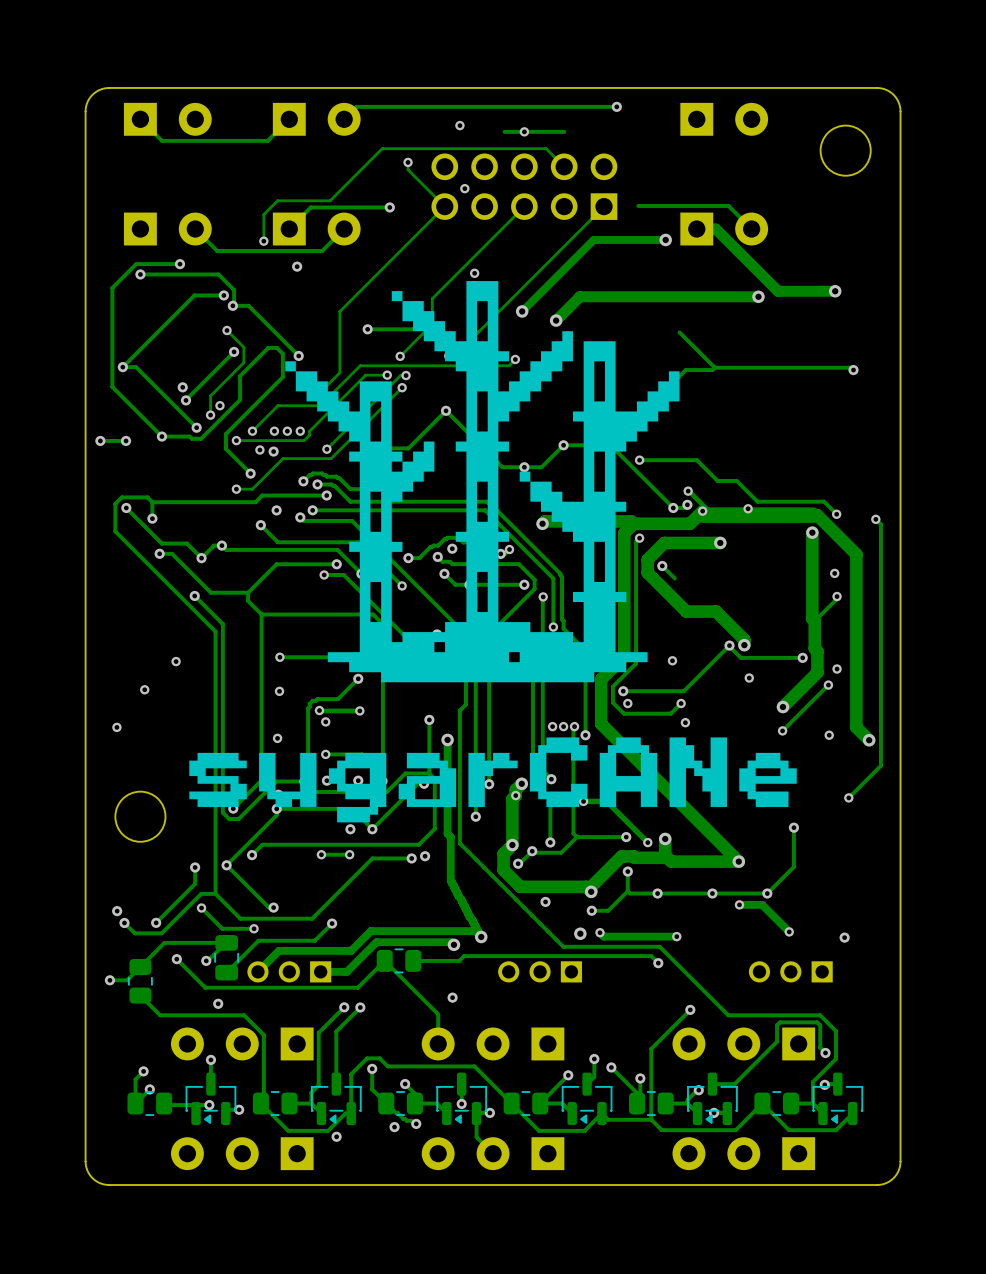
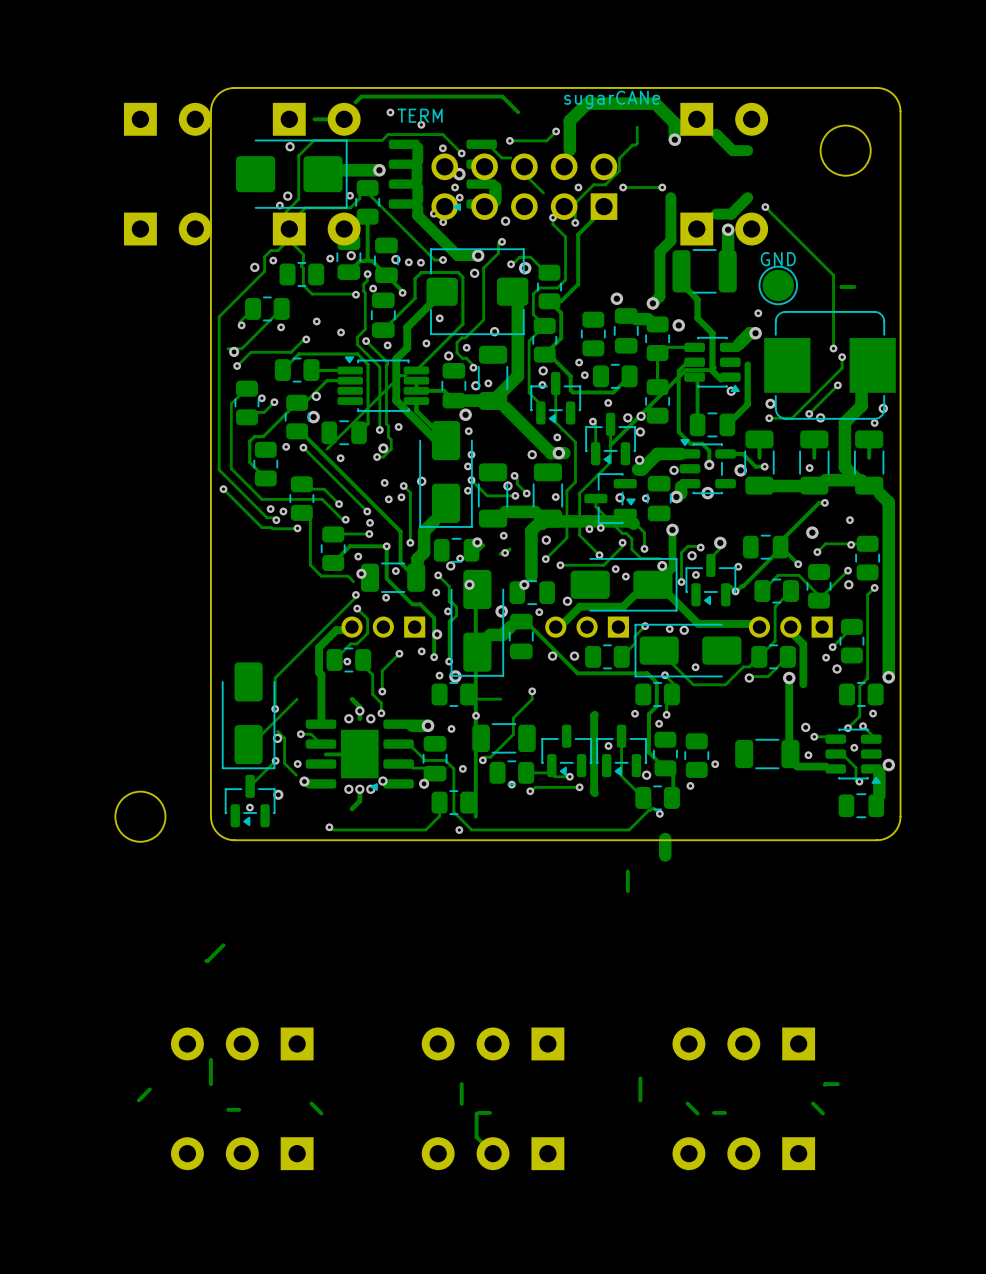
board edge: (234, 87) (106, 88) (92, 94) (85, 108) (85, 1161) (87, 1170) (92, 1178) (100, 1183) (109, 1185) (877, 1185) (887, 1182) (896, 1174) (900, 1161) (900, 816) -> (234, 87) (224, 90) (217, 94) (213, 101) (210, 111) (210, 816) (212, 825) (217, 833) (225, 838) (234, 840) (877, 840) (887, 837) (893, 833) (899, 824) (900, 816)
text: none -> sugarCANe (612, 99)
track: none -> (355, 102) (361, 96) (502, 96) (518, 112)
track: (616, 106) (356, 106) (344, 119) -> none
via: (616, 106) -> none
via: none -> (390, 112)
text: none -> TERM (420, 115)
track: (289, 119) (267, 140) (162, 140) (140, 119) -> none
track: none -> (346, 119) (314, 119)
via: none -> (421, 124)
via: (459, 125) -> none
track: none -> (637, 127) (637, 143) (632, 145) (619, 158) (619, 170) (605, 184) (593, 184) (575, 203) (575, 222)
via: (524, 131) -> none
track: none -> (556, 131) (546, 140) (509, 140)
via: none -> (556, 131)
track: (564, 131) (504, 131) -> none
track: none -> (716, 134) (732, 150) (747, 150)
track: none -> (674, 139) (674, 123) (655, 103) (587, 103) (569, 120) (569, 149)
via: none -> (674, 139)
via: none -> (509, 140)
track: none -> (488, 144) (501, 157) (510, 157)
via: none -> (290, 146)
track: none -> (417, 147) (417, 160)
via: none -> (442, 148)
track: none -> (461, 153) (442, 134) (388, 134) (382, 140) (313, 140) (298, 155) (298, 199) (286, 211) (286, 242) (277, 250) (270, 250) (264, 256) (264, 271) (219, 316) (219, 469) (266, 517) (274, 517)
via: none -> (461, 153)
track: (408, 162) (408, 169) (444, 206) (339, 311) (339, 372) (316, 396) -> none
via: (408, 162) -> none
track: none -> (514, 163) (543, 192)
track: (564, 166) (546, 148) (382, 148) (330, 200) (277, 200) (263, 214) (263, 241) -> none
track: none -> (417, 167) (417, 180)
track: none -> (379, 170) (341, 170)
via: none -> (379, 170)
part: none -> (291, 174)
via: none -> (459, 174)
part: none -> (442, 175)
track: none -> (417, 187) (417, 200)
via: none -> (455, 187)
track: none -> (495, 187) (495, 200)
via: none -> (578, 187)
via: none -> (623, 187)
track: none -> (662, 187) (623, 187)
via: none -> (662, 187)
via: (464, 188) -> none
track: none -> (367, 193) (434, 260) (443, 260)
via: none -> (350, 195)
track: none -> (359, 195) (359, 198) (350, 207) (305, 207) (292, 220) (292, 243) (303, 254) (301, 264) (303, 285) (312, 294) (352, 294)
via: none -> (287, 196)
via: none -> (459, 197)
track: none -> (670, 197) (670, 240) (659, 251) (659, 296) (652, 303)
track: none -> (747, 197) (731, 214) (716, 214)
part: none -> (367, 202)
via: none -> (279, 205)
track: (638, 205) (728, 205) (751, 229) -> none
track: (524, 206) (432, 298) (432, 324) (400, 356) -> none
track: (604, 206) (454, 355) (448, 355) -> none
track: (389, 207) (310, 207) (289, 229) -> none
via: (389, 207) -> none
track: none -> (417, 207) (417, 215) (457, 255) (478, 255)
track: none -> (765, 207) (833, 275) (833, 348)
via: none -> (765, 207)
via: none -> (433, 213)
track: none -> (597, 215) (578, 234) (578, 284) (561, 301) (549, 301) (561, 313) (561, 338) (544, 354)
track: none -> (367, 216) (367, 258)
track: none -> (552, 217) (552, 224) (565, 236) (565, 279) (557, 288) (539, 288) (533, 294) (533, 314) (544, 325)
via: none -> (552, 217)
via: none -> (505, 221)
via: none -> (443, 222)
via: none -> (575, 222)
track: (344, 229) (322, 251) (217, 251) (195, 229) -> none
track: (696, 229) (715, 229) (778, 291) (835, 291) -> none
track: none -> (728, 229) (728, 250)
via: none -> (728, 229)
track: (665, 239) (593, 239) (522, 311) -> none
via: (665, 239) -> none
via: (263, 241) -> none
via: none -> (502, 241)
track: none -> (498, 242) (498, 253) (483, 268) (483, 319) (465, 337) (461, 337) (457, 342) (457, 352) (473, 365)
via: none -> (351, 255)
via: none -> (478, 255)
part: none -> (348, 257)
via: none -> (330, 258)
track: none -> (367, 258) (402, 291)
track: none -> (367, 258) (365, 261) (359, 261) (348, 272)
via: none -> (395, 259)
text: none -> GND (778, 259)
via: none -> (273, 260)
part: none -> (386, 260)
via: none -> (443, 260)
via: none -> (408, 262)
via: none -> (420, 262)
track: (180, 264) (136, 264) (112, 287) (112, 387) (161, 436) (189, 436) (191, 438) (201, 438) (240, 399) (240, 376) (268, 347) (276, 347) (282, 353) (282, 377) (225, 433) (225, 448) (250, 473) -> none
via: (180, 264) -> none
via: none -> (511, 264)
track: none -> (512, 264) (519, 257) (530, 257) (540, 266)
via: (297, 266) -> none
via: none -> (254, 267)
via: none -> (525, 268)
track: none -> (681, 271) (681, 283) (697, 299) (697, 318) (712, 333) (712, 370) (721, 379)
part: none -> (704, 271)
track: (140, 274) (218, 274) (234, 290) (232, 305) (248, 305) (298, 355) -> none
via: (140, 274) -> none
part: none -> (301, 274)
track: none -> (367, 274) (367, 280) (363, 284) (365, 329) (357, 337) (357, 344) (379, 366) (379, 430)
via: none -> (367, 274)
drawing: [285, 281, 680, 683] -> none
part: none -> (778, 285)
part: none -> (549, 287)
track: none -> (854, 287) (841, 287)
via: none -> (373, 288)
part: none -> (477, 291)
track: none -> (512, 291) (517, 296) (517, 376) (493, 401) (453, 400) (444, 390) (416, 390) (416, 380)
via: (835, 291) -> none
via: none -> (402, 292)
via: none -> (355, 294)
track: (223, 295) (194, 295) (122, 367) (136, 367) (196, 427) -> none
via: (223, 295) -> none
track: none -> (437, 296) (407, 327) (407, 348) (396, 359) (396, 400) (438, 442)
track: (758, 296) (579, 296) (556, 320) -> none
via position: (758, 296) -> (755, 333)
via: none -> (616, 298)
via: none -> (652, 303)
via: (232, 305) -> none
part: none -> (267, 308)
track: none -> (281, 308) (241, 348) (227, 348)
via: (522, 311) -> none
via: none -> (758, 313)
part: none -> (383, 315)
track: none -> (245, 316) (239, 322)
via: none -> (439, 318)
track: (422, 319) (413, 329) (367, 329) -> none
track: none -> (648, 319) (636, 319)
via: (556, 320) -> none
via: none -> (316, 321)
via: none -> (241, 325)
via: none -> (678, 325)
via: none -> (281, 327)
via: (367, 329) -> none
track: (227, 330) (243, 347) (243, 362) (210, 395) (210, 415) -> none
via: (227, 330) -> none
track: none -> (383, 330) (415, 298) (415, 278) (421, 272) (458, 272) (462, 277) (462, 324) (416, 370)
part: none -> (626, 330)
via: none -> (494, 331)
via: none -> (341, 332)
track: (679, 332) (714, 367) (851, 367) (853, 370) -> none
track: none -> (536, 333) (529, 341) (529, 392) (538, 402)
track: none -> (755, 333) (750, 333) (739, 344)
part: none -> (593, 334)
part: none -> (657, 338)
track: none -> (304, 339) (291, 352) (250, 352) (237, 366)
via: none -> (306, 339)
part: none -> (544, 340)
track: none -> (366, 341) (387, 362) (386, 424) (388, 426) (388, 437) (391, 439) (391, 449) (383, 457) (377, 457)
via: none -> (366, 341)
via: none -> (426, 343)
via: none -> (387, 345)
via: none -> (466, 347)
track: none -> (694, 347) (663, 347) (657, 353) (657, 387)
via: none -> (833, 348)
track: (234, 351) (186, 400) -> none
track: none -> (549, 354) (570, 376) (570, 390) (572, 392) (613, 392) (629, 376)
via: (298, 355) -> none
via: (400, 356) -> none
track: none -> (842, 357) (842, 368) (791, 418) (769, 418)
via: none -> (842, 357)
track: (515, 359) (509, 365) (360, 365) (320, 405) (277, 405) (252, 431) -> none
via: (515, 359) -> none
via: none -> (579, 362)
track: none -> (685, 364) (678, 370) (678, 431) (690, 443) (702, 443) (709, 450) (709, 464)
part: none -> (712, 364)
track: none -> (747, 364) (747, 404) (727, 424)
part: none -> (829, 365)
track: none -> (872, 365) (861, 376) (861, 405) (844, 422) (844, 467) (861, 483)
via: none -> (237, 366)
via: (122, 367) -> none
via: none -> (473, 367)
track: none -> (282, 370) (298, 354) (357, 354) (368, 364) (368, 423) (359, 432)
part: none -> (297, 370)
track: none -> (311, 370) (350, 370)
via: none -> (543, 370)
via: (853, 370) -> none
track: (387, 375) (365, 375) (309, 431) (309, 435) (304, 440) (236, 440) -> none
via: (387, 375) -> none
via: (406, 375) -> none
via: none -> (584, 375)
part: none -> (615, 376)
part: none -> (493, 377)
track: none -> (694, 377) (697, 380) (697, 424)
track: none -> (350, 380) (327, 380) (304, 402) (297, 402) (263, 436) (254, 436) (249, 441) (249, 462) (265, 478)
via: none -> (488, 383)
track: none -> (555, 383) (555, 422) (575, 442) (575, 482) (566, 490) (566, 537) (545, 559)
part: none -> (383, 384)
via: none -> (542, 384)
part: none -> (453, 385)
via: none -> (475, 385)
track: none -> (837, 385) (809, 413)
via: none -> (837, 385)
via: (182, 387) -> none
track: (402, 387) (331, 458) (283, 458) (252, 489) (236, 489) -> none
via: (402, 387) -> none
via: none -> (731, 391)
track: none -> (239, 395) (231, 403) (231, 468) (261, 499) (322, 499) (342, 519)
via: none -> (261, 398)
part: none -> (555, 398)
via: (186, 400) -> none
track: none -> (416, 401) (416, 411) (446, 440)
part: none -> (657, 401)
part: none -> (246, 402)
track: none -> (274, 402) (264, 412) (257, 412)
via: none -> (274, 402)
via: none -> (608, 402)
via: none -> (770, 403)
via: (219, 405) -> none
track: none -> (505, 407) (551, 453) (564, 453)
via: none -> (883, 408)
via: (446, 410) -> none
via: none -> (809, 413)
via: none -> (465, 414)
via: (210, 415) -> none
via: none -> (641, 416)
part: none -> (297, 417)
via: none -> (313, 417)
via: none -> (627, 417)
via: none -> (820, 417)
via: none -> (769, 418)
via: none -> (592, 421)
via: none -> (874, 422)
track: none -> (595, 423) (595, 453)
track: none -> (610, 424) (610, 462) (579, 493) (579, 535) (599, 555)
part: none -> (712, 424)
via: none -> (398, 426)
via: (196, 427) -> none
via: none -> (379, 430)
via: (252, 431) -> none
via: (274, 431) -> none
via: (287, 431) -> none
via: (300, 431) -> none
via: none -> (468, 431)
via: none -> (640, 431)
part: none -> (344, 432)
via: (161, 436) -> none
track: none -> (306, 437) (400, 531) (400, 562) (409, 571)
via: none -> (557, 437)
part: none -> (610, 439)
track: none -> (759, 439) (759, 457)
track: none -> (814, 439) (814, 457)
track: none -> (869, 439) (869, 457)
via: (100, 440) -> none
track: (126, 440) (100, 440) -> none
via: (126, 440) -> none
via: (236, 440) -> none
via: (563, 445) -> none
via: none -> (286, 446)
track: none -> (303, 447) (367, 511)
via: none -> (303, 447)
track: (383, 448) (408, 448) (446, 410) (502, 467) (541, 467) (563, 445) (610, 445) (673, 507) (684, 507) (687, 504) -> none
via: (259, 449) -> none
via: (326, 449) -> none
via: (273, 451) -> none
via: none -> (558, 453)
track: none -> (681, 453) (657, 453) (641, 469) (638, 469)
track: none -> (725, 453) (742, 453) (755, 466) (764, 466)
via: none -> (471, 454)
via: none -> (532, 454)
via: none -> (377, 457)
via: none -> (340, 458)
track: (639, 460) (696, 460) (717, 480) (736, 480) (757, 501) (824, 501) (836, 514) -> none
part: none -> (759, 462)
part: none -> (814, 462)
part: none -> (869, 462)
part: none -> (265, 464)
via: none -> (709, 464)
via: none -> (467, 466)
part: none -> (707, 466)
via: none -> (764, 466)
via: (524, 467) -> none
via: none -> (809, 468)
via: none -> (674, 470)
via: none -> (740, 470)
via: (250, 473) -> none
part: none -> (446, 474)
via: none -> (514, 475)
track: none -> (517, 478) (517, 484) (526, 493)
track: none -> (471, 480) (487, 495) (515, 495)
via: none -> (471, 480)
track: none -> (861, 480) (825, 480)
track: (303, 481) (312, 473) (322, 473) (326, 476) (339, 478) (350, 489) (395, 489) -> none
via: (303, 481) -> none
via: none -> (421, 481)
via: none -> (384, 482)
track: (317, 484) (334, 486) (350, 501) (486, 501) (489, 503) (562, 576) (563, 628) (585, 652) (585, 735) -> none
via: (317, 484) -> none
track: none -> (403, 486) (410, 492) (410, 542)
via: none -> (403, 486)
via: none -> (507, 486)
track: none -> (681, 486) (681, 493) (676, 497)
track: none -> (813, 486) (768, 486)
track: none -> (223, 489) (261, 527) (296, 527)
via: none -> (223, 489)
via: (236, 489) -> none
track: none -> (312, 489) (324, 489) (339, 504)
via: none -> (467, 490)
track: (688, 491) (706, 508) -> none
via: (688, 491) -> none
via: none -> (526, 493)
via: none -> (707, 493)
track: none -> (880, 493) (888, 502) (888, 677)
track: (326, 495) (262, 495) (255, 502) (152, 502) -> none
via: (326, 495) -> none
part: none -> (493, 495)
via: none -> (515, 495)
part: none -> (547, 495)
via: none -> (401, 497)
via: none -> (555, 497)
via: none -> (619, 497)
via: none -> (676, 497)
part: none -> (301, 498)
track: none -> (595, 498) (595, 506) (622, 533) (626, 533) (631, 538) (631, 549) (641, 558) (660, 558)
part: none -> (610, 498)
via: none -> (645, 498)
part: none -> (659, 498)
via: none -> (388, 499)
track: (152, 502) (152, 518) -> none
track: (152, 502) (147, 497) (121, 497) (115, 503) (115, 531) (215, 631) (215, 893) -> none
track: none -> (824, 502) (819, 502) (780, 541)
via: none -> (824, 502)
via: none -> (339, 504)
via: (687, 504) -> none
track: (126, 507) (161, 543) (186, 543) (201, 558) (214, 545) (221, 545) (226, 549) (337, 549) (361, 573) -> none
via: (126, 507) -> none
via: (673, 507) -> none
via: (748, 508) -> none
via: none -> (270, 509)
via: (276, 510) -> none
track: (312, 510) (485, 510) (553, 578) (553, 627) -> none
via: (312, 510) -> none
via: none -> (283, 511)
via: none -> (367, 511)
track: none -> (535, 511) (505, 511)
track: (702, 511) (690, 523) (633, 523) (624, 533) (624, 656) (601, 679) (601, 724) (738, 861) (671, 861) (665, 855) (662, 857) (621, 856) (591, 886) (591, 891) (586, 886) (520, 886) (503, 870) (503, 853) (512, 845) (512, 798) (515, 795) (515, 789) (521, 783) -> none
via: (702, 511) -> none
track: none -> (625, 513) (644, 532) (644, 548)
via: (836, 514) -> none
track: (701, 515) (817, 515) (856, 554) (856, 727) (869, 740) -> none
track: (300, 517) (303, 520) (352, 520) (465, 634) (465, 704) (459, 710) (459, 843) (563, 946) (659, 946) (728, 1015) (820, 1015) (836, 1031) (836, 1058) (812, 1082) (812, 1103) (791, 1103) -> none
via: (300, 517) -> none
via: (152, 518) -> none
track: none -> (310, 519) (310, 565) (321, 576) (348, 576) (353, 581)
via: none -> (345, 519)
track: (875, 519) (880, 524) (880, 765) (848, 797) -> none
via: (875, 519) -> none
via: none -> (276, 520)
via: none -> (849, 520)
track: none -> (434, 521) (424, 531) (424, 552) (417, 559) (417, 580)
via: none -> (370, 522)
via: (542, 523) -> none
track: (260, 525) (277, 542) (358, 542) (402, 585) -> none
via: (260, 525) -> none
track: none -> (536, 526) (531, 530) (531, 576)
via: none -> (600, 527)
via: none -> (297, 528)
via: none -> (589, 529)
track: none -> (672, 529) (672, 568) (669, 571)
via: none -> (672, 529)
track: (812, 532) (812, 618) (814, 621) -> none
track: none -> (369, 534) (333, 534)
via: none -> (369, 534)
via: none -> (503, 535)
track: (639, 538) (636, 541) (636, 663) (612, 686) (612, 702) (623, 713) (670, 713) (681, 703) -> none
via: (639, 538) -> none
via: none -> (546, 540)
via: none -> (410, 542)
track: (477, 542) (463, 542) (457, 537) (447, 537) (438, 545) (430, 547) (419, 558) (408, 558) -> none
via: none -> (622, 542)
track: (720, 542) (664, 542) (647, 559) (647, 572) (686, 611) (716, 611) (744, 639) (744, 645) -> none
track: none -> (867, 543) (825, 543) (817, 552)
track: none -> (483, 544) (472, 556)
via: none -> (851, 544)
via: (221, 545) -> none
via: none -> (386, 546)
track: none -> (622, 546) (603, 565) (560, 565)
track: none -> (697, 546) (687, 546) (681, 552) (681, 582)
via: none -> (700, 547)
part: none -> (765, 547)
part: none -> (333, 548)
via: (452, 548) -> none
via: none -> (644, 548)
track: none -> (720, 548) (710, 557)
via: (509, 549) -> none
part: none -> (456, 550)
via: none -> (505, 552)
via: none -> (817, 552)
track: (159, 553) (172, 553) (210, 592) (248, 592) -> none
via: (159, 553) -> none
via: (500, 553) -> none
track: none -> (788, 554) (798, 564)
via: none -> (599, 555)
via: none -> (692, 555)
track: none -> (773, 555) (736, 591) (730, 586)
via: none -> (358, 556)
track: (437, 556) (442, 561) (449, 561) (452, 564) (518, 564) (534, 579) (534, 589) (489, 634) (489, 784) -> none
via: (437, 556) -> none
via: (201, 558) -> none
via: (408, 558) -> none
via: none -> (460, 558)
part: none -> (867, 558)
via: none -> (545, 559)
track: none -> (333, 563) (349, 546) (386, 546) (386, 578) (412, 604) (420, 604) (434, 618) (434, 657)
track: (336, 564) (276, 564) (248, 592) -> none
via: (336, 564) -> none
via: none -> (798, 564)
via: none -> (450, 565)
via: none -> (560, 565)
track: (662, 565) (674, 578) -> none
via: none -> (738, 566)
via: none -> (615, 569)
track: none -> (848, 570) (825, 593)
via: none -> (848, 570)
via: none -> (395, 571)
track: (444, 573) (455, 584) (524, 584) -> none
via: (444, 573) -> none
via: (834, 573) -> none
track: (324, 574) (343, 574) (403, 634) (437, 634) -> none
via: (324, 574) -> none
via: none -> (695, 574)
track: none -> (438, 575) (449, 586) (449, 601) (456, 607) (456, 615) (449, 621) (449, 661)
via: none -> (438, 575)
via: none -> (625, 576)
part: none -> (393, 577)
part: none -> (710, 580)
via: none -> (681, 582)
part: none -> (624, 584)
via: none -> (848, 584)
via: (402, 585) -> none
part: none -> (819, 586)
track: none -> (874, 587) (867, 594) (867, 678) (859, 686) (859, 716) (848, 728)
via: none -> (874, 587)
via: none -> (735, 591)
track: none -> (762, 591) (778, 575) (798, 575) (819, 596)
part: none -> (776, 591)
track: none -> (791, 591) (775, 606) (775, 641) (749, 666) (743, 666) (725, 684) (693, 684) (659, 650)
track: (248, 592) (248, 601) (261, 614) -> none
via: none -> (436, 592)
part: none -> (532, 592)
via: none -> (355, 594)
track: (194, 595) (222, 624) (222, 812) (229, 819) (238, 819) (276, 781) (304, 781) (314, 792) (386, 792) (405, 773) (429, 773) -> none
via: (194, 595) -> none
track: none -> (634, 595) (623, 606) (580, 606) (564, 622)
track: (543, 596) (542, 770) (551, 779) -> none
via: (543, 596) -> none
track: none -> (670, 596) (698, 623) (750, 623)
via: (837, 596) -> none
track: none -> (355, 597) (275, 678) (275, 708)
via: none -> (386, 597)
track: (837, 598) (814, 621) -> none
via: none -> (567, 601)
track: none -> (357, 608) (367, 619) (367, 633) (357, 643) (350, 643) (334, 660)
via: none -> (357, 608)
via: none -> (447, 611)
via: none -> (501, 611)
via: none -> (539, 612)
track: (261, 614) (261, 780) (233, 808) -> none
track: (261, 614) (373, 614) (382, 624) (382, 781) -> none
track: (814, 621) (817, 672) (782, 707) -> none
part: none -> (477, 623)
track: none -> (511, 626) (502, 634) (489, 634)
track: none -> (645, 626) (634, 636) (634, 643) (621, 656)
via: none -> (645, 626)
part: none -> (383, 627)
track: none -> (531, 627) (577, 673) (647, 673) (656, 682) (656, 706) (648, 714) (648, 752) (657, 761)
via: (553, 627) -> none
part: none -> (587, 627)
part: none -> (790, 627)
track: none -> (851, 627) (832, 647)
via: none -> (669, 629)
track: none -> (342, 630) (336, 630) (319, 647) (321, 720)
track: none -> (794, 635) (803, 644) (803, 684)
part: none -> (521, 636)
part: none -> (851, 641)
via: (729, 645) -> none
via: (744, 645) -> none
via: none -> (832, 647)
track: (533, 648) (533, 780) (550, 798) (550, 842) -> none
part: none -> (688, 650)
via: none -> (421, 651)
track: none -> (399, 653) (382, 670) (382, 691)
via: none -> (399, 653)
part: none -> (607, 656)
part: none -> (773, 656)
track: none -> (787, 656) (768, 676) (747, 676)
track: (279, 657) (351, 657) (357, 663) -> none
via: (279, 657) -> none
via: none -> (434, 657)
track: (802, 657) (740, 657) (729, 645) (683, 691) (623, 691) -> none
via: (802, 657) -> none
via: none -> (826, 657)
part: none -> (348, 660)
via position: (672, 660) -> (684, 630)
via: (176, 661) -> none
via: none -> (347, 661)
via: none -> (449, 661)
via: none -> (695, 667)
track: none -> (368, 670) (372, 674) (372, 694) (381, 703) (381, 713)
via: none -> (439, 675)
via: none -> (664, 675)
via: none -> (455, 676)
track: none -> (667, 677) (673, 683)
via: none -> (888, 677)
track: (358, 678) (337, 699) (317, 699) (309, 703) (308, 758) -> none
via: (358, 678) -> none
track: none -> (789, 678) (789, 740)
via: none -> (789, 678)
track: (828, 685) (782, 730) -> none
via: (828, 685) -> none
via: (144, 689) -> none
via: (279, 691) -> none
via: none -> (382, 691)
track: none -> (532, 691) (532, 699) (513, 717) (513, 734) (490, 757) (484, 757)
via: none -> (532, 691)
via: (623, 691) -> none
part: none -> (453, 694)
part: none -> (657, 694)
part: none -> (861, 694)
track: none -> (297, 699) (251, 744)
track: none -> (352, 699) (359, 707) (359, 718)
via: (627, 703) -> none
via: (681, 703) -> none
track: none -> (666, 704) (666, 714)
via: (782, 707) -> none
via: none -> (275, 708)
track: (319, 710) (359, 710) -> none
via: (319, 710) -> none
via: none -> (381, 713)
via: none -> (635, 713)
via: none -> (873, 713)
track: none -> (594, 714) (594, 793)
via: none -> (666, 714)
part: none -> (248, 715)
via: none -> (476, 715)
via: none -> (348, 718)
via: none -> (370, 718)
track: (429, 719) (429, 773) -> none
via: (429, 719) -> none
via: (325, 721) -> none
via: (685, 722) -> none
via: none -> (659, 723)
track: none -> (428, 725) (412, 725)
via: (552, 726) -> none
via: (563, 726) -> none
track: (574, 726) (573, 833) (576, 837) -> none
via: (574, 726) -> none
track: none -> (863, 726) (871, 734)
via: none -> (863, 726)
via: (116, 727) -> none
via: none -> (805, 727)
via: none -> (451, 728)
via: none -> (848, 728)
via: (782, 730) -> none
track: none -> (277, 731) (284, 738) (284, 763) (296, 775)
track: none -> (300, 734) (311, 734) (321, 744)
via: none -> (300, 734)
via: (585, 735) -> none
via: (829, 735) -> none
track: none -> (621, 736) (621, 776) (650, 805)
via: none -> (814, 736)
track: none -> (826, 736) (814, 736)
drawing: [189, 737, 797, 823] -> none
part: none -> (504, 738)
track: (447, 739) (447, 833) (450, 837) (450, 880) (480, 935) -> none
via position: (447, 739) -> (428, 725)
via position: (869, 740) -> (888, 765)
track: none -> (409, 744) (425, 760) (445, 760) (453, 768) (453, 812) (471, 829) (629, 829) (648, 810) (653, 808) (659, 813)
via: none -> (608, 746)
via: none -> (854, 747)
part: none -> (566, 750)
part: none -> (621, 750)
via: (325, 754) -> none
part: none -> (665, 754)
part: none -> (767, 754)
track: none -> (842, 754) (855, 767) (855, 780)
part: none -> (359, 755)
part: none -> (696, 755)
via: none -> (808, 755)
part: none -> (853, 756)
part: none -> (435, 758)
track: none -> (275, 760) (250, 786)
via: none -> (275, 760)
via: none -> (482, 760)
via: none -> (297, 763)
via: none -> (715, 764)
track: none -> (826, 766) (797, 766)
track: none -> (424, 768) (412, 768)
via: none -> (462, 768)
part: none -> (511, 772)
track: none -> (548, 772) (526, 772)
track: none -> (879, 772) (879, 795)
track: (429, 773) (434, 778) (434, 828) (418, 844) (262, 844) (252, 855) -> none
via: none -> (646, 775)
track: none -> (673, 775) (673, 788)
track: none -> (566, 776) (554, 776)
via: none -> (569, 776)
via: (551, 779) -> none
via: (326, 780) -> none
via: (358, 780) -> none
via: none -> (859, 781)
track: (424, 783) (417, 783) (372, 829) (352, 808) (276, 808) (276, 815) (226, 865) (268, 907) (273, 907) -> none
via: (521, 783) -> none
via: (489, 784) -> none
via: none -> (511, 784)
via: none -> (690, 785)
track: none -> (579, 787) (535, 787) (531, 791)
via: none -> (579, 787)
via: none -> (348, 789)
track: none -> (359, 789) (359, 801) (352, 808)
via: none -> (359, 789)
via: none -> (370, 789)
via: none -> (530, 791)
via: (515, 795) -> none
part: none -> (657, 797)
via: (848, 797) -> none
part: none -> (250, 801)
track: (583, 801) (606, 801) (647, 842) -> none
via: (583, 801) -> none
track: none -> (439, 802) (439, 816) (425, 829) (332, 829)
part: none -> (453, 802)
part: none -> (861, 805)
via: none -> (249, 807)
via: (233, 808) -> none
via: (276, 808) -> none
via: none -> (659, 813)
via: (475, 816) -> none
via: none -> (329, 827)
track: (793, 827) (793, 866) (767, 893) (630, 893) (627, 891) (608, 910) (591, 910) -> none
via: (793, 827) -> none
via: (350, 829) -> none
via: (372, 829) -> none
via: none -> (459, 830)
track: (576, 837) (561, 852) (532, 851) (518, 863) -> none
track: (626, 837) (576, 837) -> none
via: (626, 837) -> none
via: (665, 838) -> none
via: (550, 842) -> none
via: (647, 842) -> none
via: (512, 845) -> none
via: (532, 851) -> none
via: (321, 854) -> none
track: (349, 854) (321, 854) -> (500, 699) (472, 699)
via: (349, 854) -> none
via: (252, 855) -> none
via: (425, 856) -> none
track: (411, 858) (372, 858) (312, 918) (240, 918) (215, 893) -> none
via: (411, 858) -> none
via: (738, 861) -> none
via: (518, 863) -> none
via: (226, 865) -> none
track: (195, 867) (195, 883) (156, 922) -> none
via: (195, 867) -> none
via: (627, 871) -> none
via: (591, 891) -> none
track: (215, 893) (201, 893) (161, 933) (134, 933) (124, 922) -> none
via: (657, 893) -> none
via: (712, 893) -> none
via: (767, 893) -> none
via: (545, 901) -> none
track: (739, 904) (762, 904) (789, 931) -> none
via: (739, 904) -> none
via: (273, 907) -> none
track: (201, 908) (222, 928) (254, 928) -> none
via: (201, 908) -> none
via: (591, 910) -> none
via: (117, 911) -> none
via: (124, 922) -> none
via: (156, 922) -> none
track: (332, 923) (314, 940) (258, 940) (226, 972) -> none
via: (332, 923) -> none
via: (254, 928) -> none
via: (789, 931) -> none
track: (600, 932) (603, 936) (676, 936) -> none
via: (600, 932) -> none
via: (580, 933) -> none
track: (481, 936) (475, 931) (370, 931) (351, 950) (278, 950) (257, 971) -> none
via: (481, 936) -> none
via: (676, 936) -> none
via: (844, 937) -> none
track: (226, 942) (164, 942) (127, 980) (109, 980) -> none
track: (453, 944) (451, 942) (376, 942) (346, 971) (320, 971) -> none
via: (453, 944) -> none
part: (226, 957) -> none
track: (176, 959) (205, 987) (357, 987) (384, 960) (438, 1014) (438, 1043) -> none
via: (176, 959) -> none
via: (206, 960) -> none
part: (399, 960) -> none
track: (413, 960) (459, 960) (464, 956) (651, 956) (658, 963) -> none
via: (658, 963) -> none
part: (289, 971) -> none
part: (540, 971) -> none
part: (790, 971) -> none
via: (109, 980) -> none
part: (140, 981) -> none
track: (140, 995) (160, 1015) (244, 1015) (263, 1035) (263, 1100) (260, 1103) (288, 1130) (328, 1130) (345, 1113) (351, 1113) (351, 1074) (367, 1058) (379, 1058) (387, 1066) (474, 1066) (539, 1130) (584, 1130) (601, 1113) (608, 1119) (651, 1119) -> none
via: (452, 997) -> none
via: (218, 1003) -> none
track: (344, 1007) (318, 1032) (318, 1085) (311, 1092) (311, 1103) (289, 1103) -> none
via: (344, 1007) -> none
track: (360, 1007) (336, 1031) (336, 1084) -> none
via: (360, 1007) -> none
track: (690, 1009) (651, 1048) (651, 1119) -> none
via: (690, 1009) -> none
track: (825, 1052) (820, 1047) (820, 1025) (817, 1022) (780, 1022) (777, 1025) (777, 1041) (734, 1084) (712, 1084) -> none
via: (825, 1052) -> none
track: (594, 1058) (594, 1076) (587, 1084) -> none
via: (594, 1058) -> none
via: (210, 1059) -> none
track: (611, 1067) (637, 1093) (637, 1103) -> none
via: (611, 1067) -> none
track: (372, 1068) (372, 1089) (386, 1103) -> none
via: (372, 1068) -> none
track: (143, 1071) (135, 1079) (135, 1103) -> none
via: (143, 1071) -> none
track: (568, 1075) (543, 1100) -> none
via: (568, 1075) -> none
via: (640, 1078) -> none
track: (405, 1084) (414, 1093) (414, 1103) (436, 1103) (446, 1113) -> none
via: (405, 1084) -> none
via: (824, 1084) -> none
via: (149, 1089) -> none
track: (698, 1090) (687, 1100) (687, 1103) (665, 1103) -> none
via: (698, 1090) -> none
part: (210, 1098) -> none
part: (336, 1098) -> none
part: (461, 1098) -> none
part: (587, 1098) -> none
part: (712, 1098) -> none
part: (837, 1098) -> none
part: (149, 1103) -> none
part: (275, 1103) -> none
part: (400, 1103) -> none
via: (461, 1103) -> none
part: (525, 1103) -> none
track: (540, 1103) (562, 1103) (572, 1113) -> none
part: (651, 1103) -> none
part: (776, 1103) -> none
track: (209, 1105) (167, 1105) -> none
via: (209, 1105) -> none
track: (389, 1106) (403, 1119) (416, 1123) -> none
via: (239, 1109) -> none
via: (489, 1112) -> none
via: (714, 1112) -> none
track: (852, 1113) (836, 1130) (789, 1130) (762, 1103) (735, 1130) (661, 1130) (651, 1119) -> none
via: (416, 1123) -> none
via: (394, 1127) -> none
via: (336, 1136) -> none

